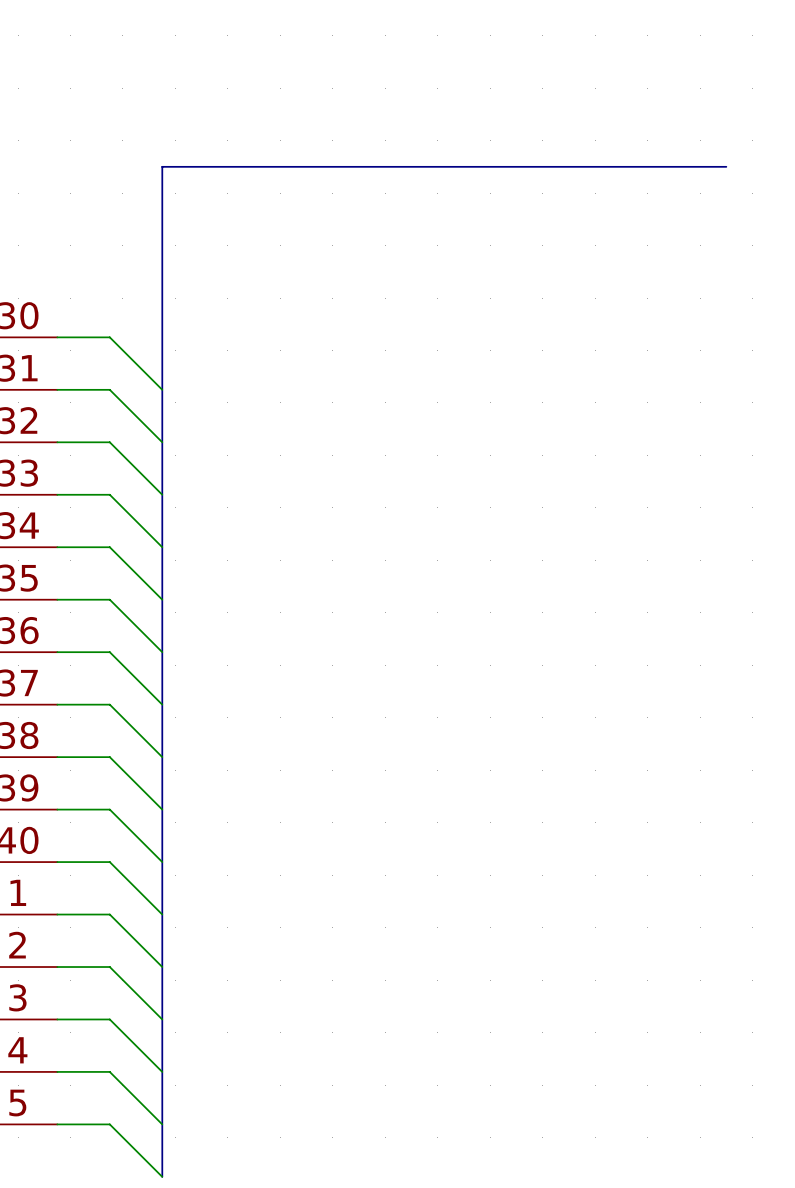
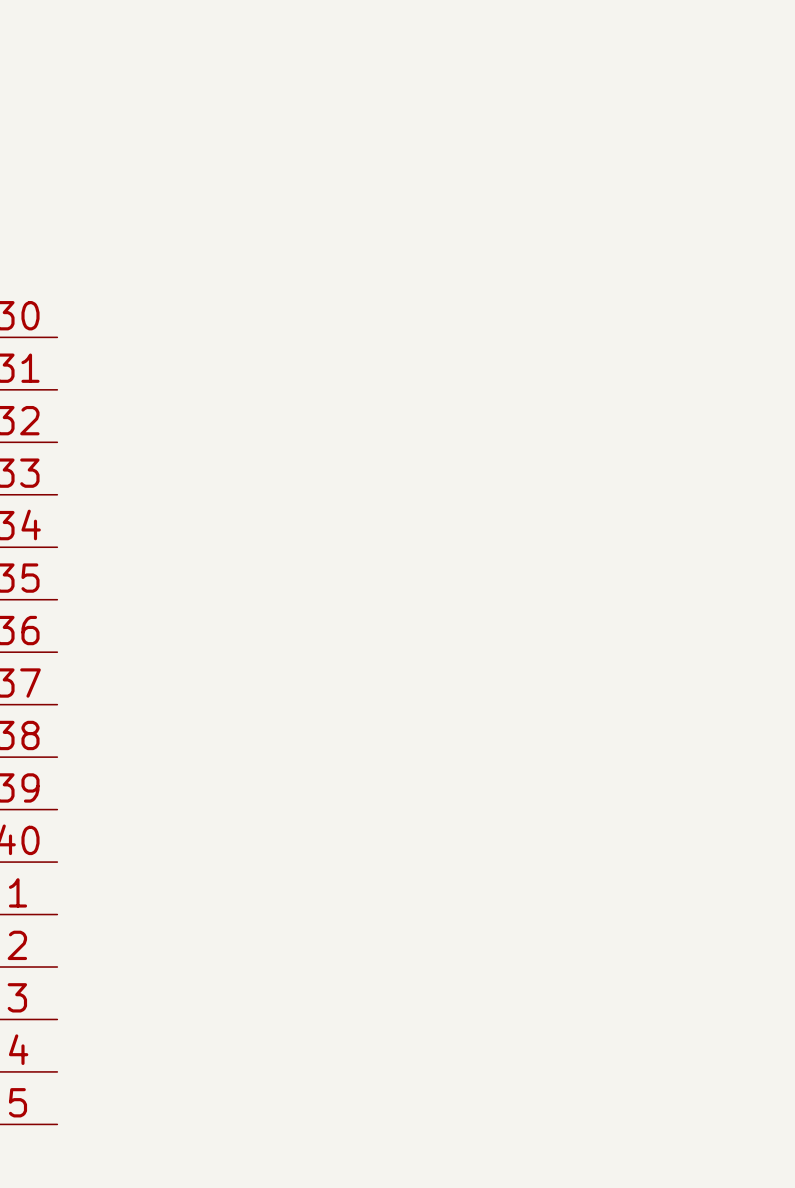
bus: (726, 166) (162, 166) (162, 1176) -> none
wire: (57, 337) (109, 337) (162, 389) -> none
wire: (57, 389) (109, 389) (162, 442) -> none
wire: (57, 442) (109, 442) (162, 494) -> none
wire: (57, 494) (109, 494) (162, 547) -> none
wire: (57, 547) (109, 547) (162, 599) -> none
wire: (57, 599) (109, 599) (162, 652) -> none
wire: (57, 652) (109, 652) (162, 704) -> none
wire: (57, 704) (109, 704) (162, 757) -> none
wire: (57, 757) (109, 757) (162, 809) -> none
wire: (57, 809) (109, 809) (162, 862) -> none
wire: (57, 862) (109, 862) (162, 914) -> none
wire: (57, 914) (109, 914) (162, 967) -> none
wire: (57, 967) (109, 967) (162, 1019) -> none
wire: (57, 1019) (109, 1019) (162, 1071) -> none
wire: (57, 1071) (109, 1071) (162, 1124) -> none
wire: (57, 1124) (109, 1124) (162, 1176) -> none

